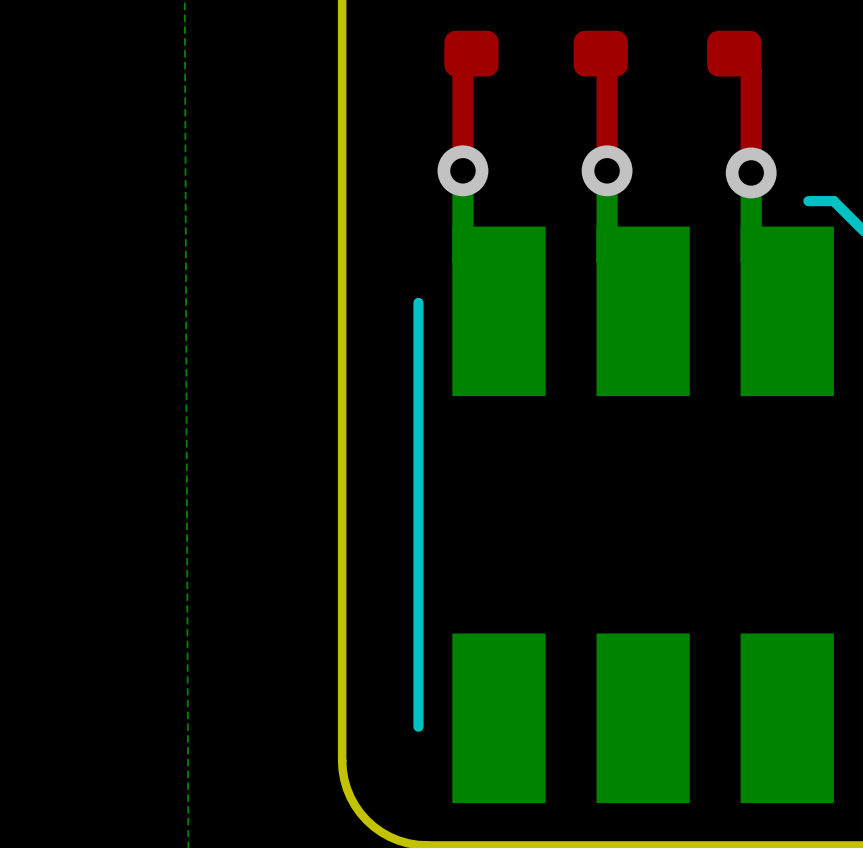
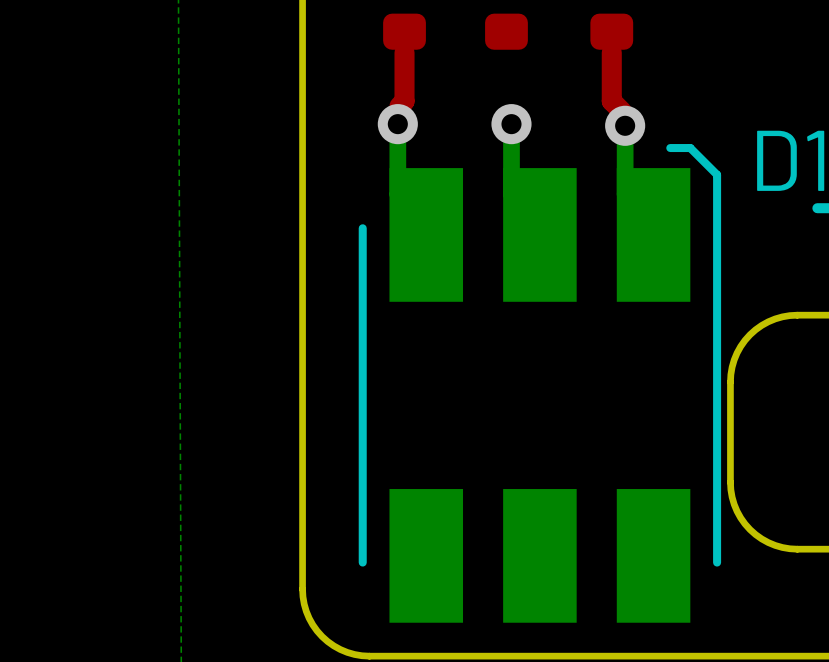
top track: (471, 53) (462, 62) (462, 170) -> none
top track: (600, 53) (607, 59) (607, 170) -> none
top track: (734, 53) (751, 70) (751, 172) -> none
top track: none -> (404, 52) (404, 101) (399, 106)
top track: none -> (611, 61) (611, 52) (611, 101) (621, 111)

